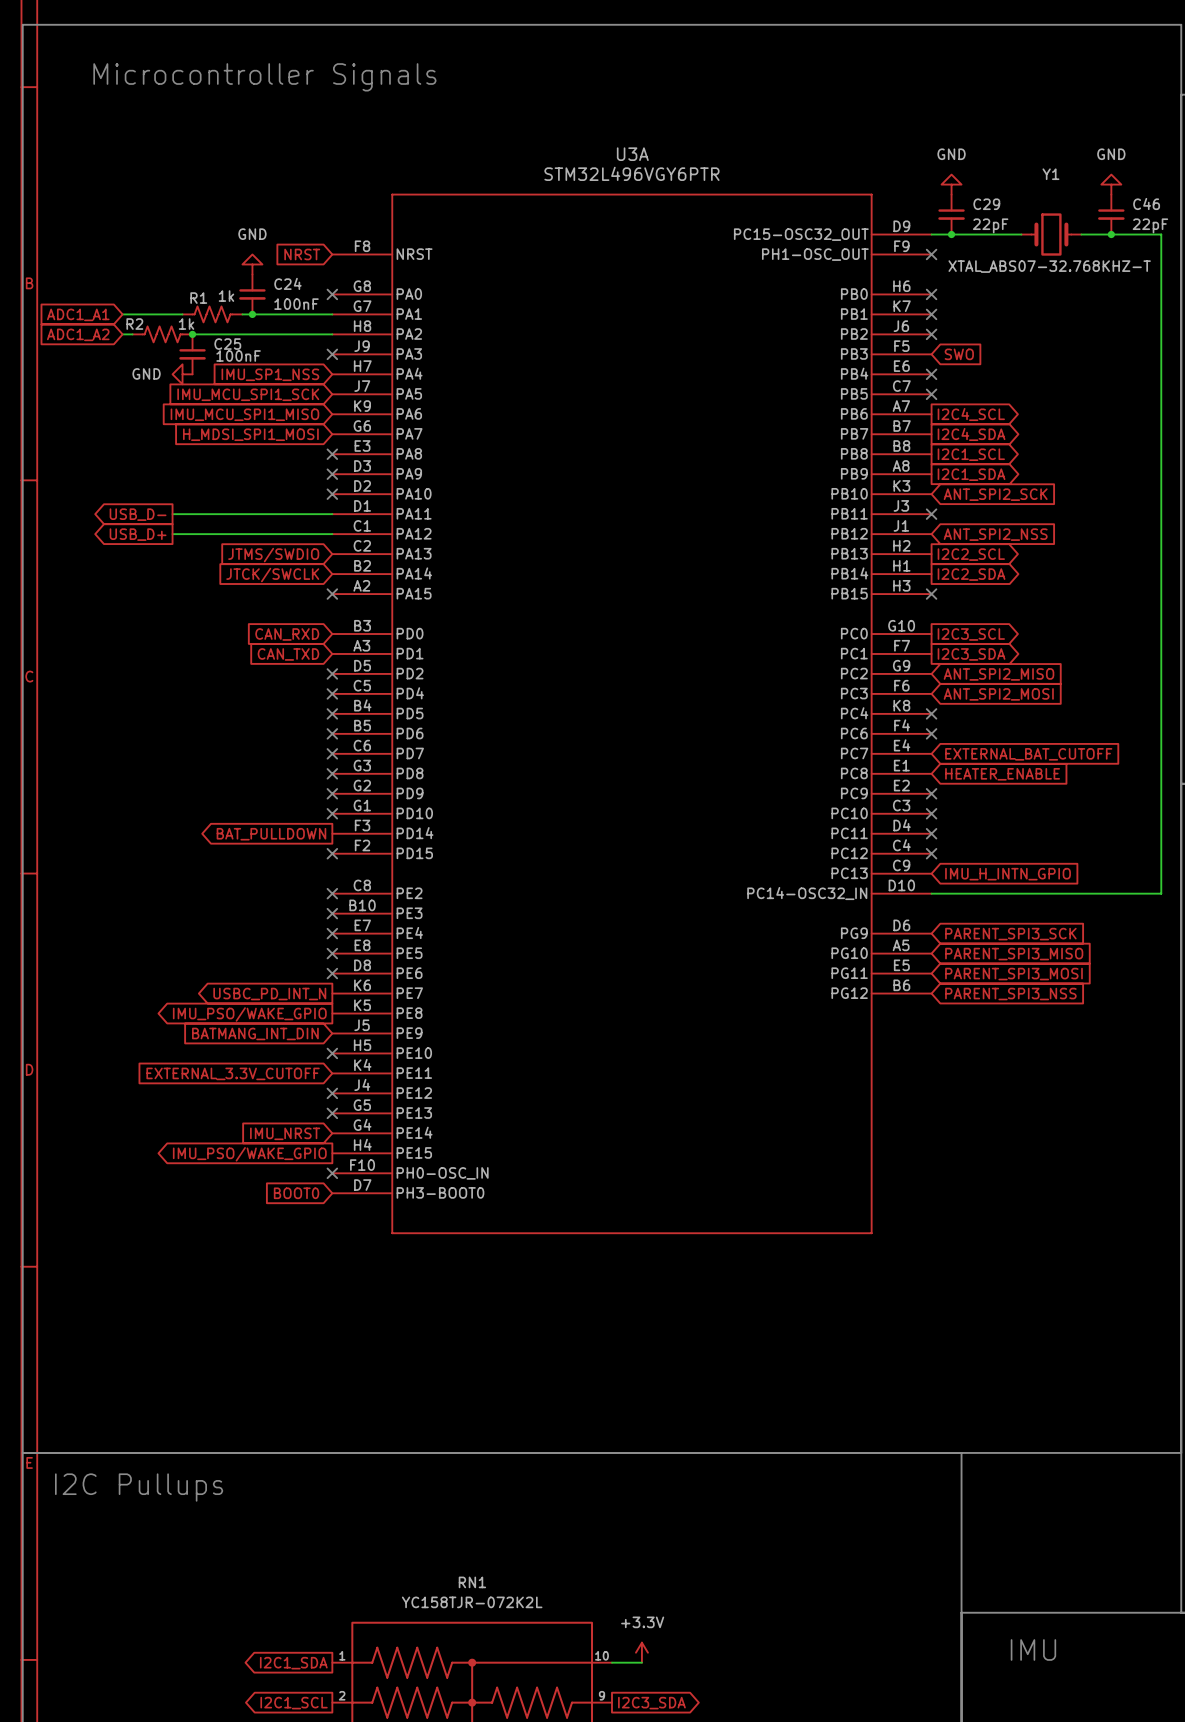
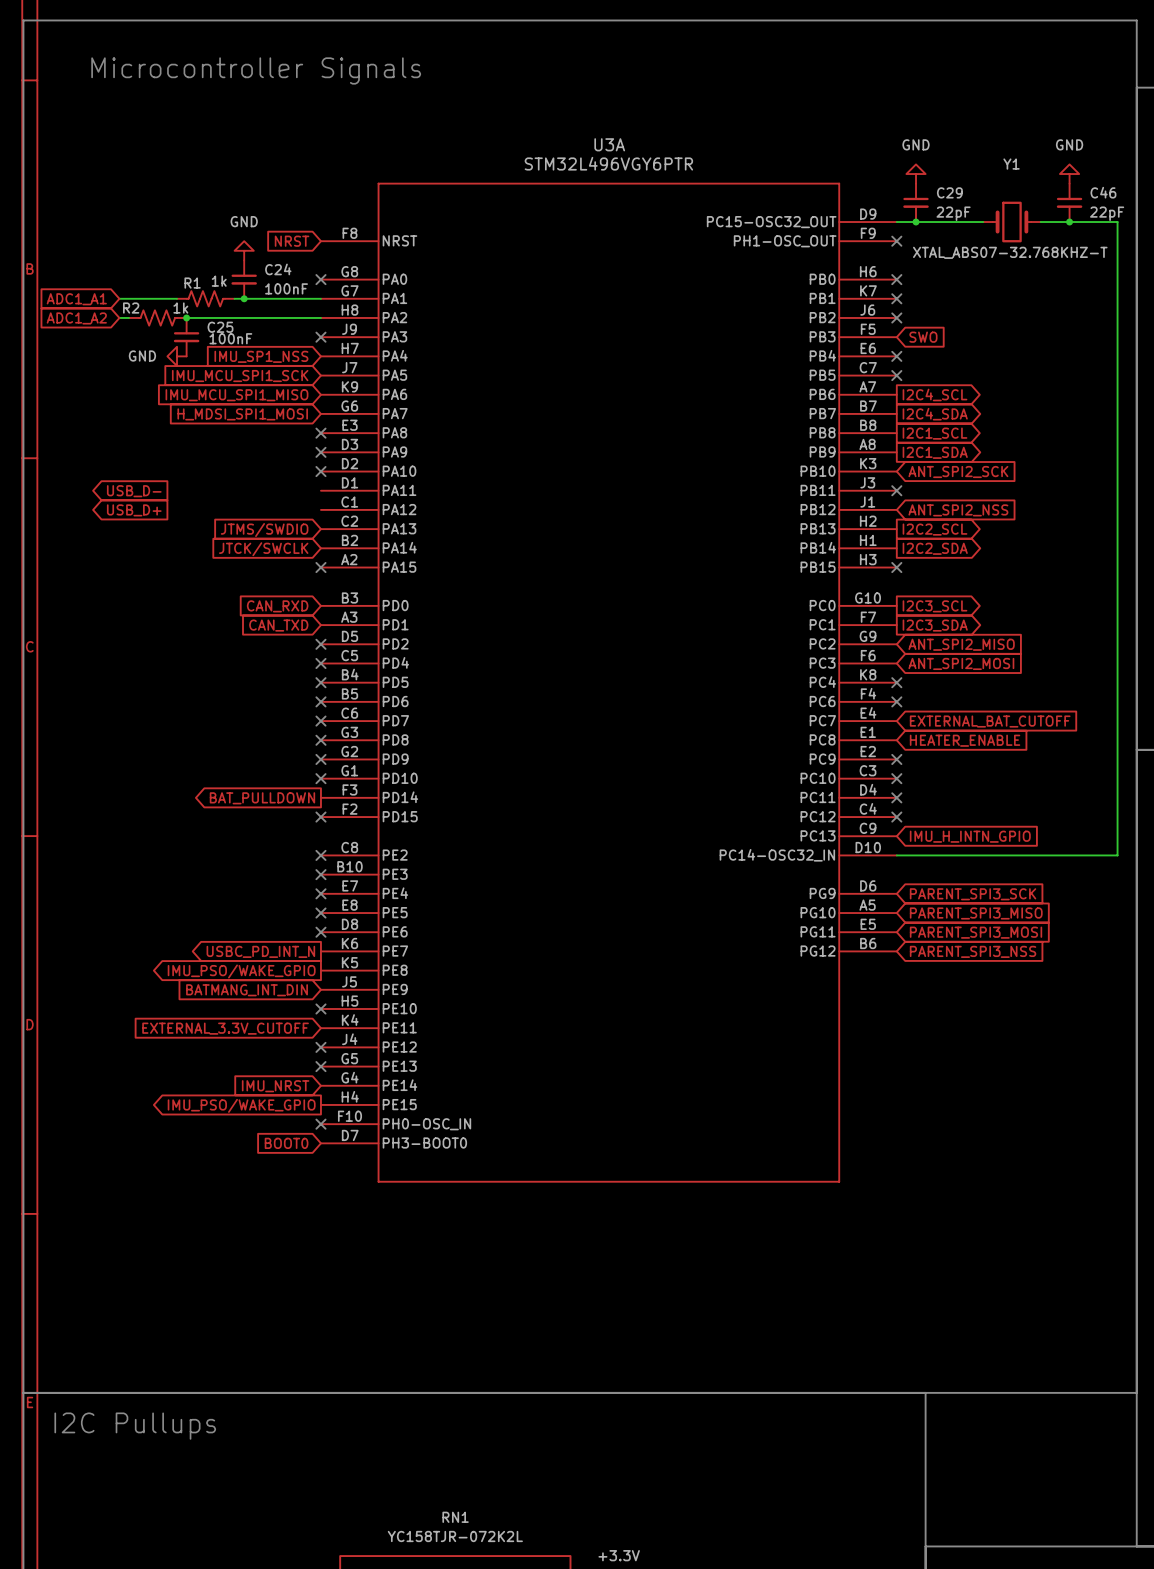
wire: (172, 514) (332, 514) -> none
wire: (172, 534) (332, 534) -> none

